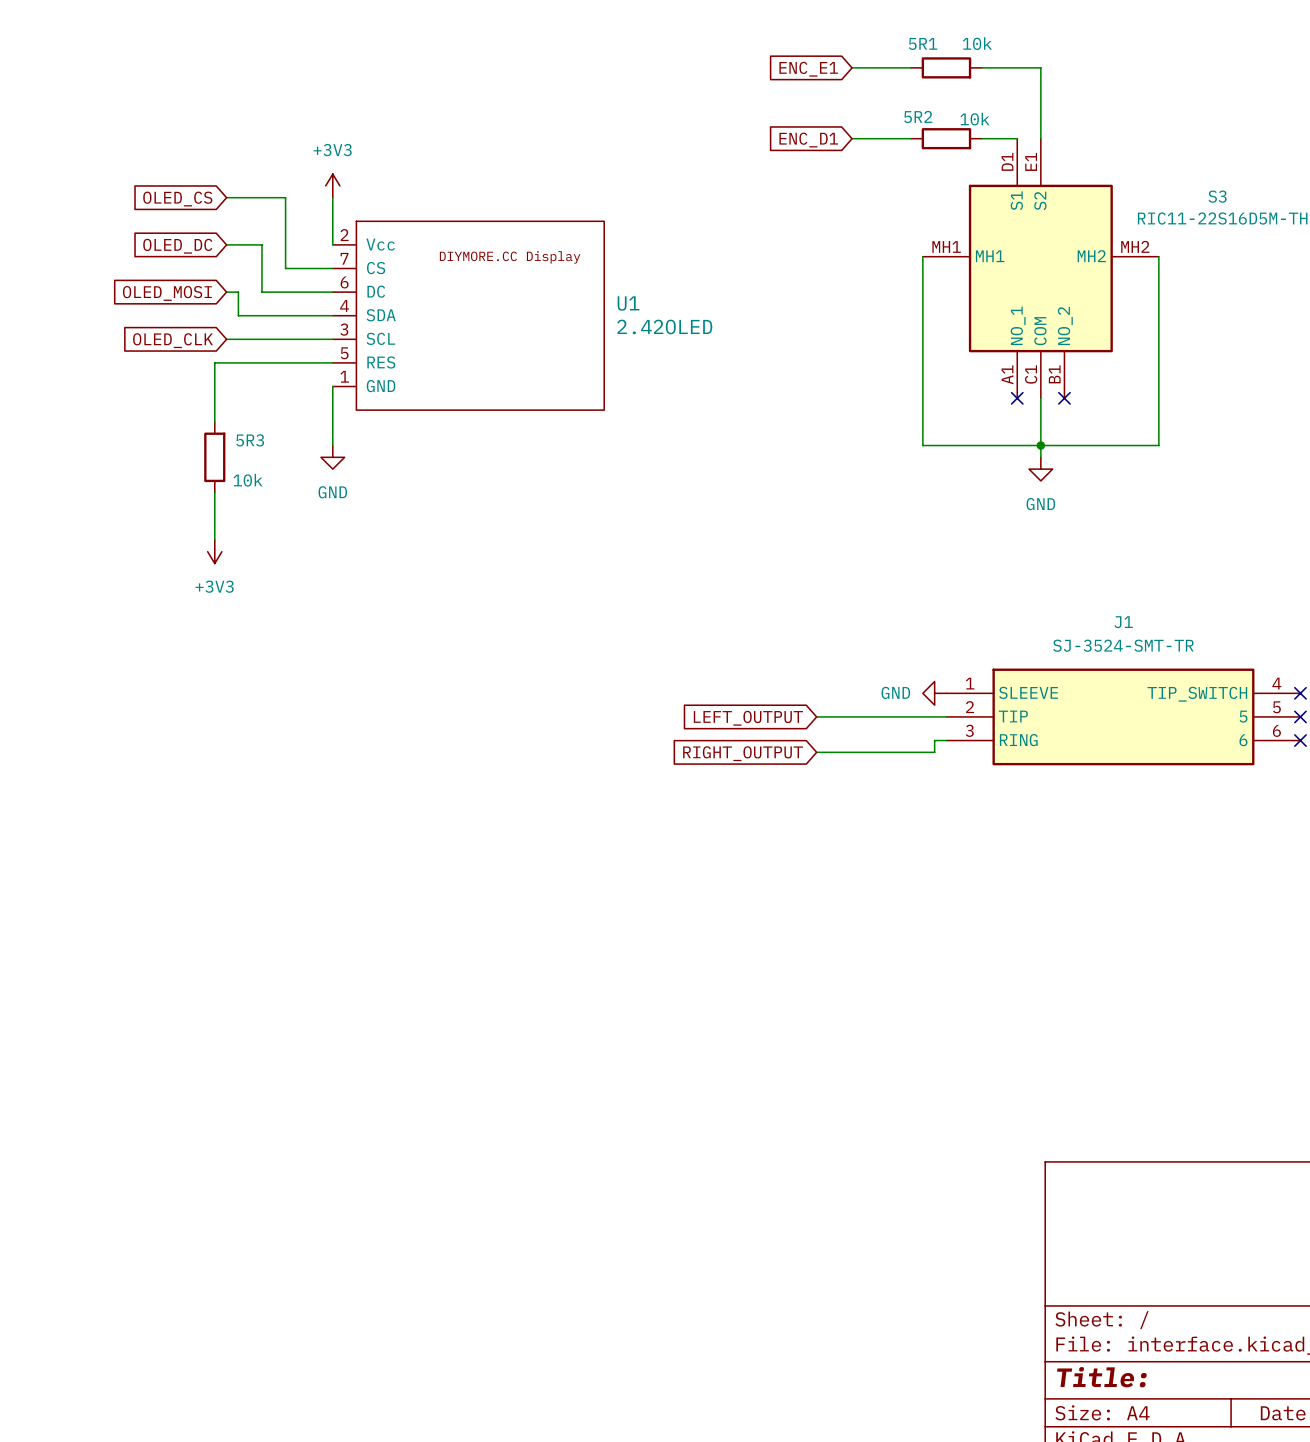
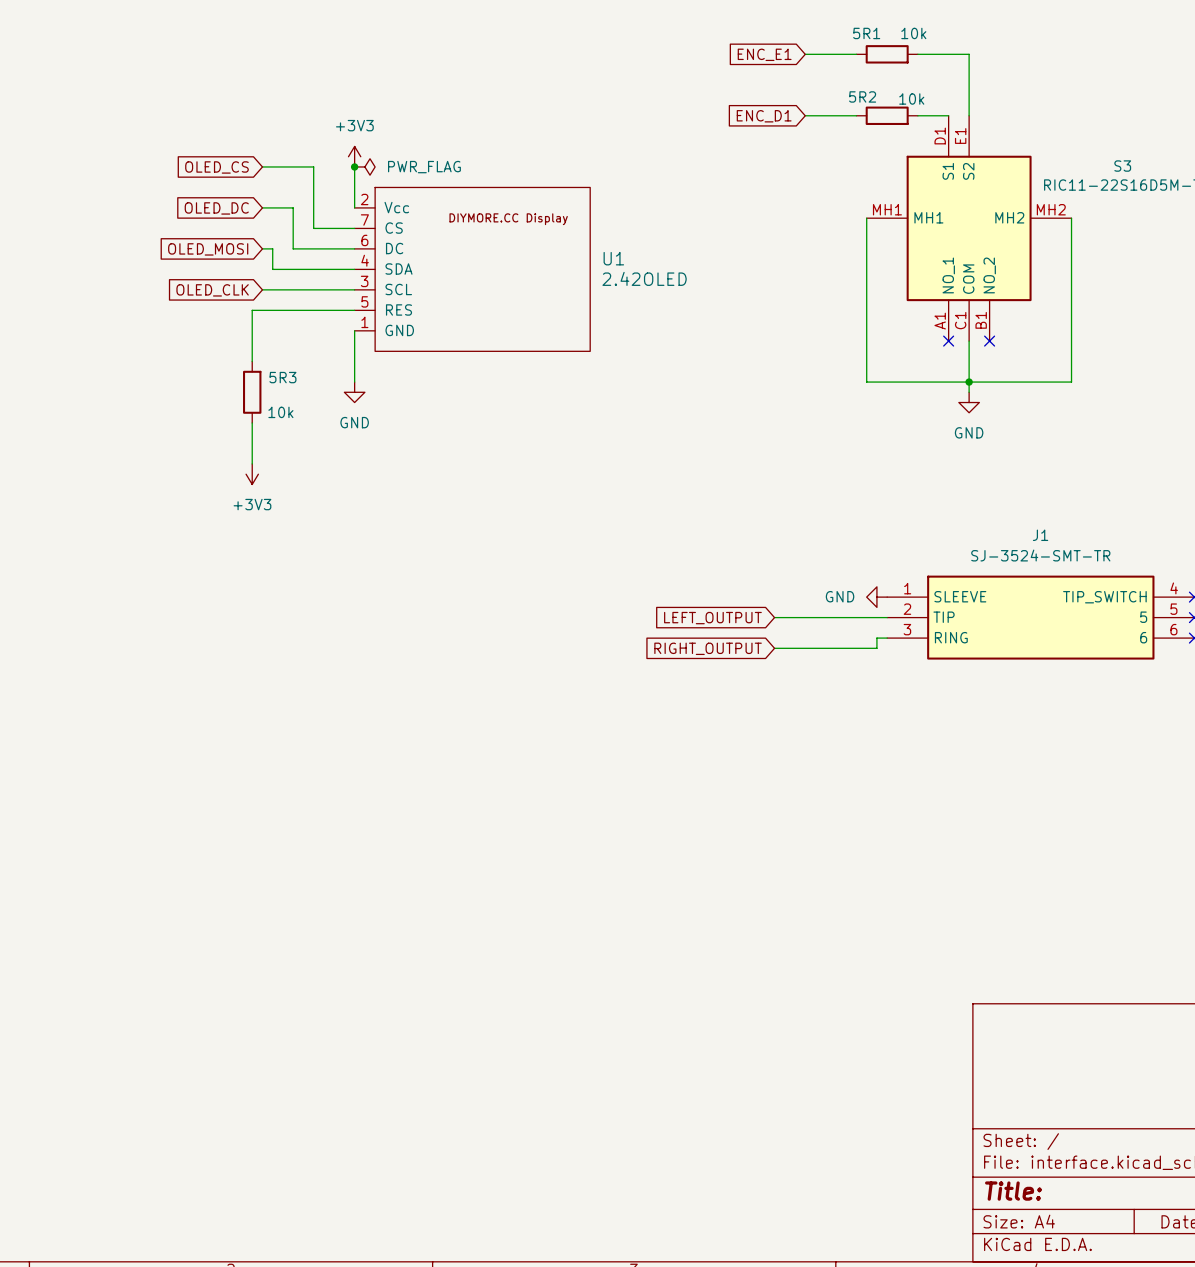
junction: none -> (354, 166)
power symbol: none -> PWR_FLAG (364, 166)

